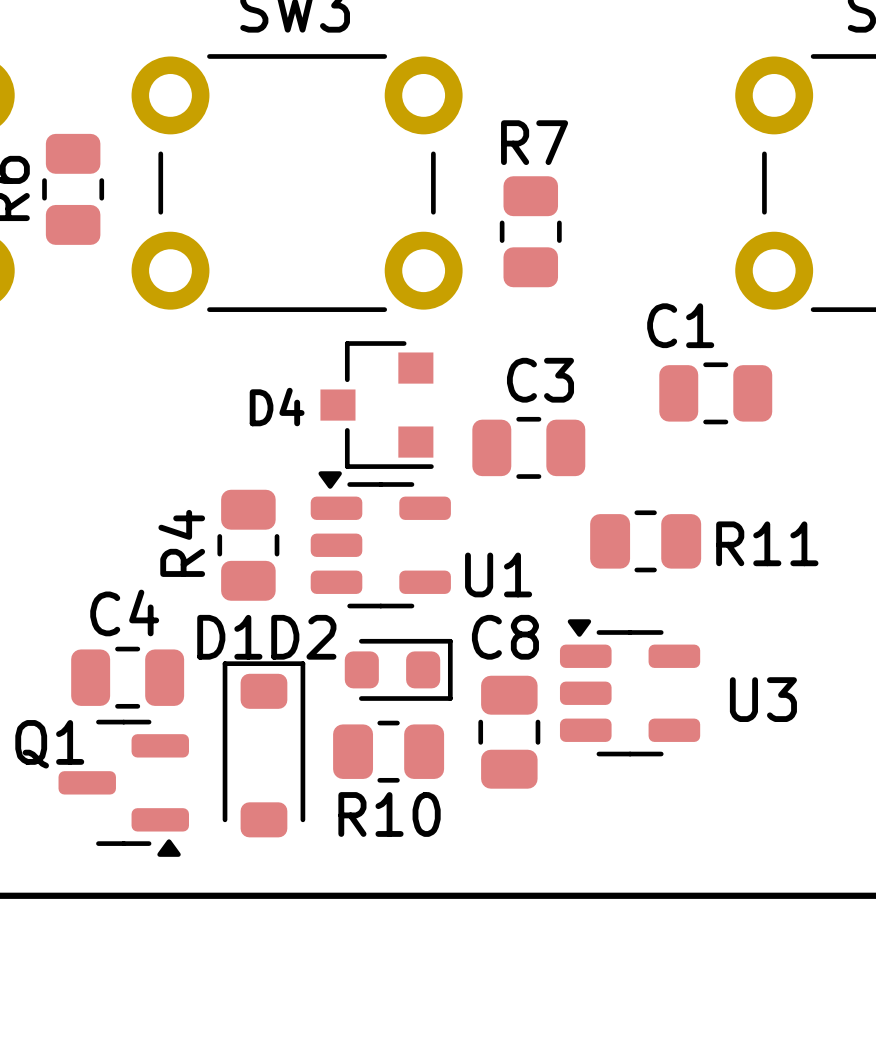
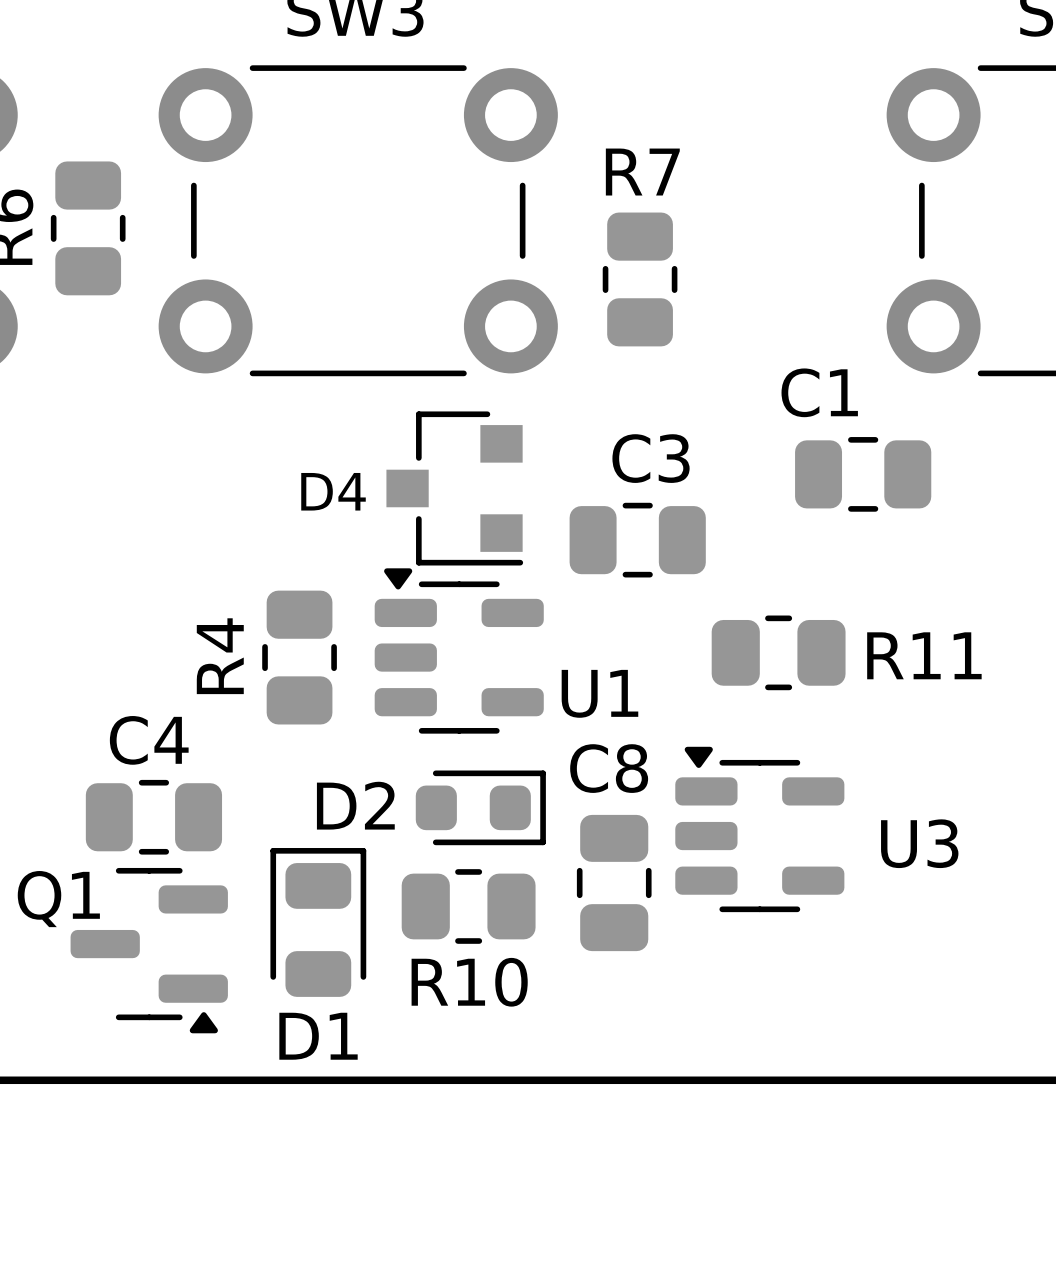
D1 name position: D1 (229, 637) -> D1 (318, 1036)
D2 name position: D2 (303, 637) -> D2 (355, 805)
D1 footprint: [222, 661, 306, 838] -> [270, 848, 367, 997]

